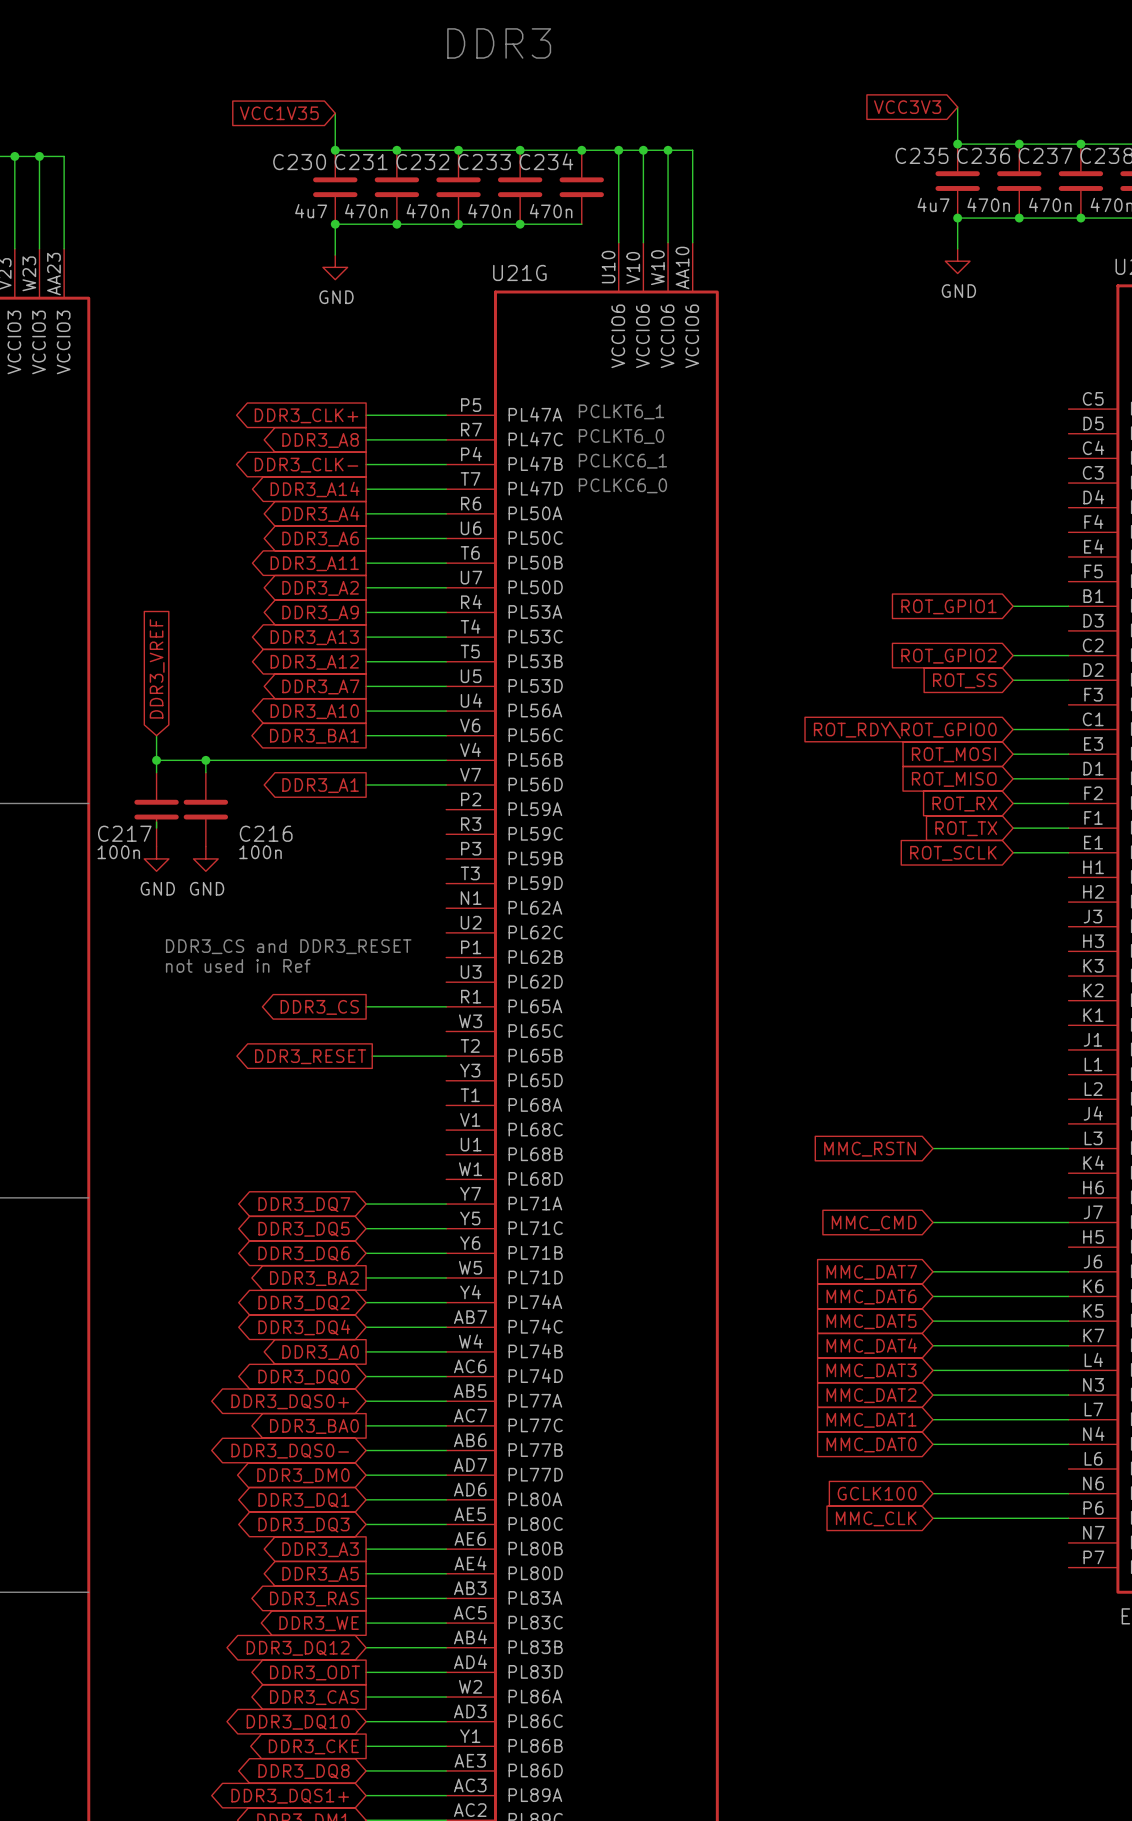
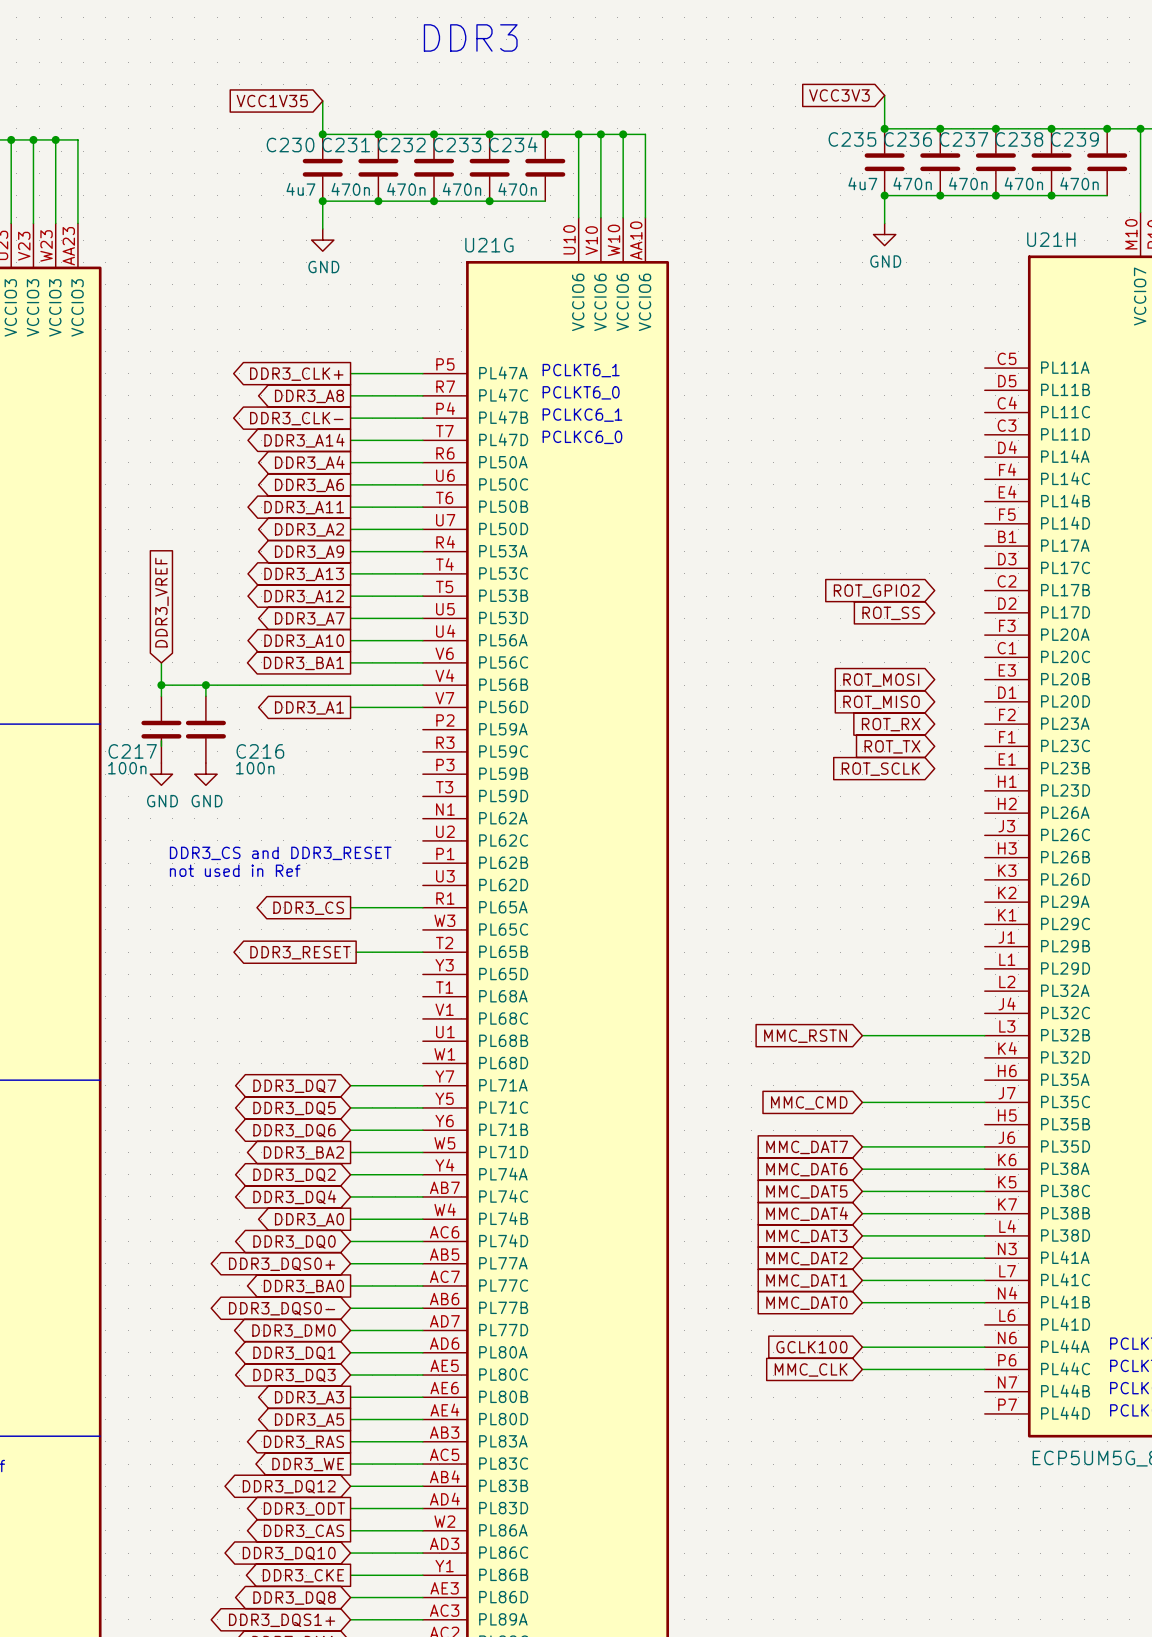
global label: ROT_GPIO1 (948, 606) -> none
wire: (1013, 606) (1068, 606) -> none
wire: (1013, 655) (1068, 655) -> none
wire: (1013, 680) (1068, 680) -> none
wire: (1013, 729) (1068, 729) -> none
global label: ROT_RDY\ROT_GPIO0 (905, 730) -> none
wire: (1013, 754) (1068, 754) -> none
wire: (1013, 778) (1068, 778) -> none
wire: (1013, 803) (1068, 803) -> none
wire: (1013, 828) (1068, 828) -> none
wire: (1013, 852) (1068, 852) -> none

